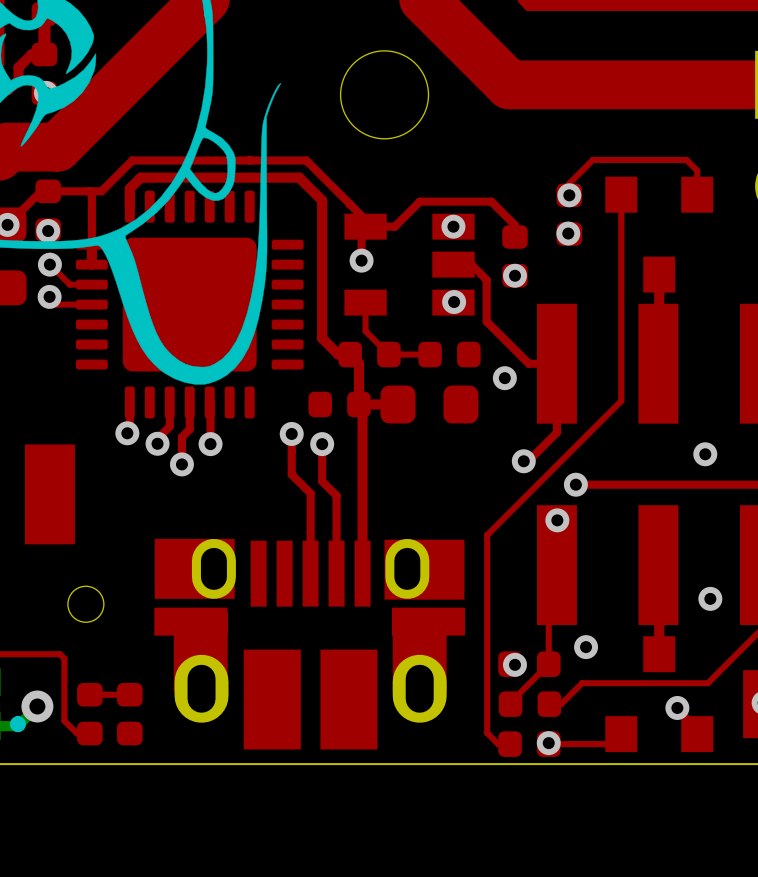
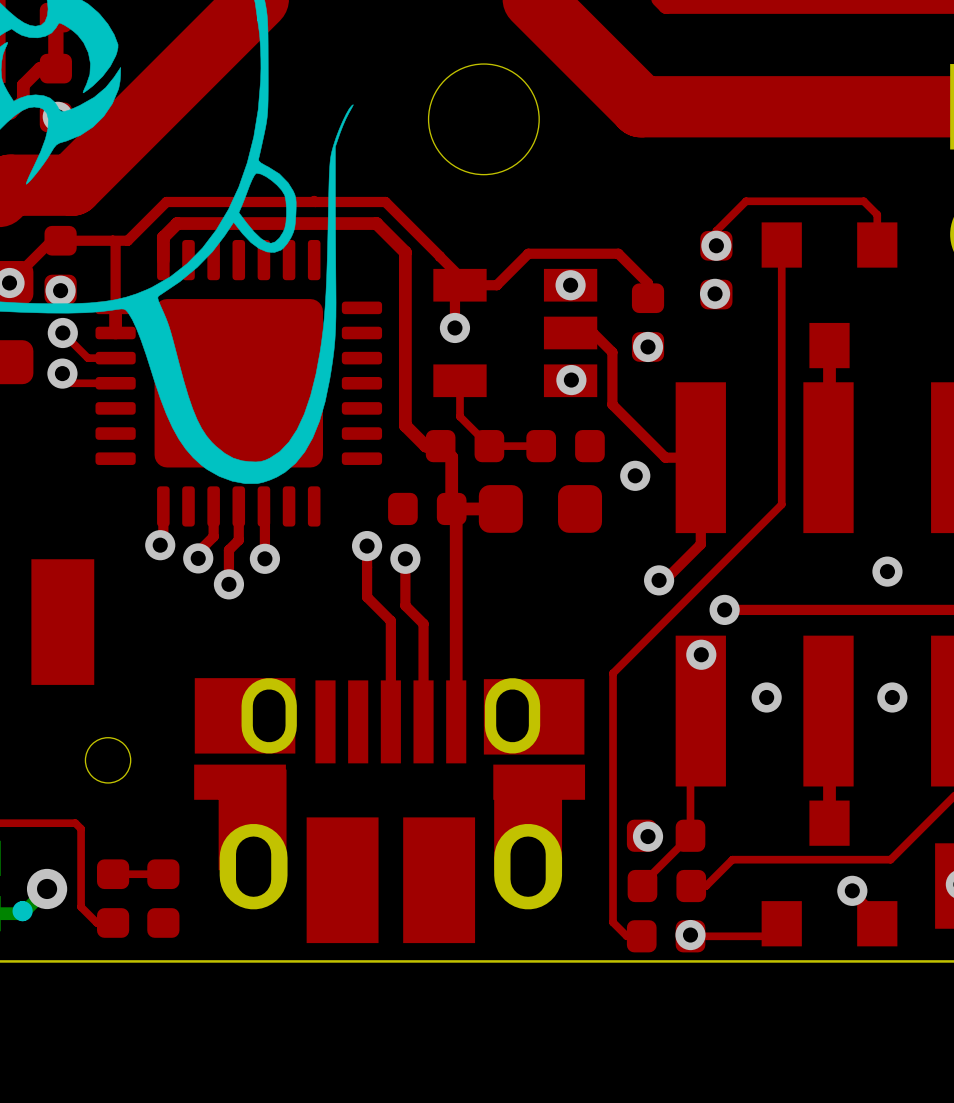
via: none -> (766, 697)
via position: (710, 598) -> (892, 697)
via: (586, 647) -> none

